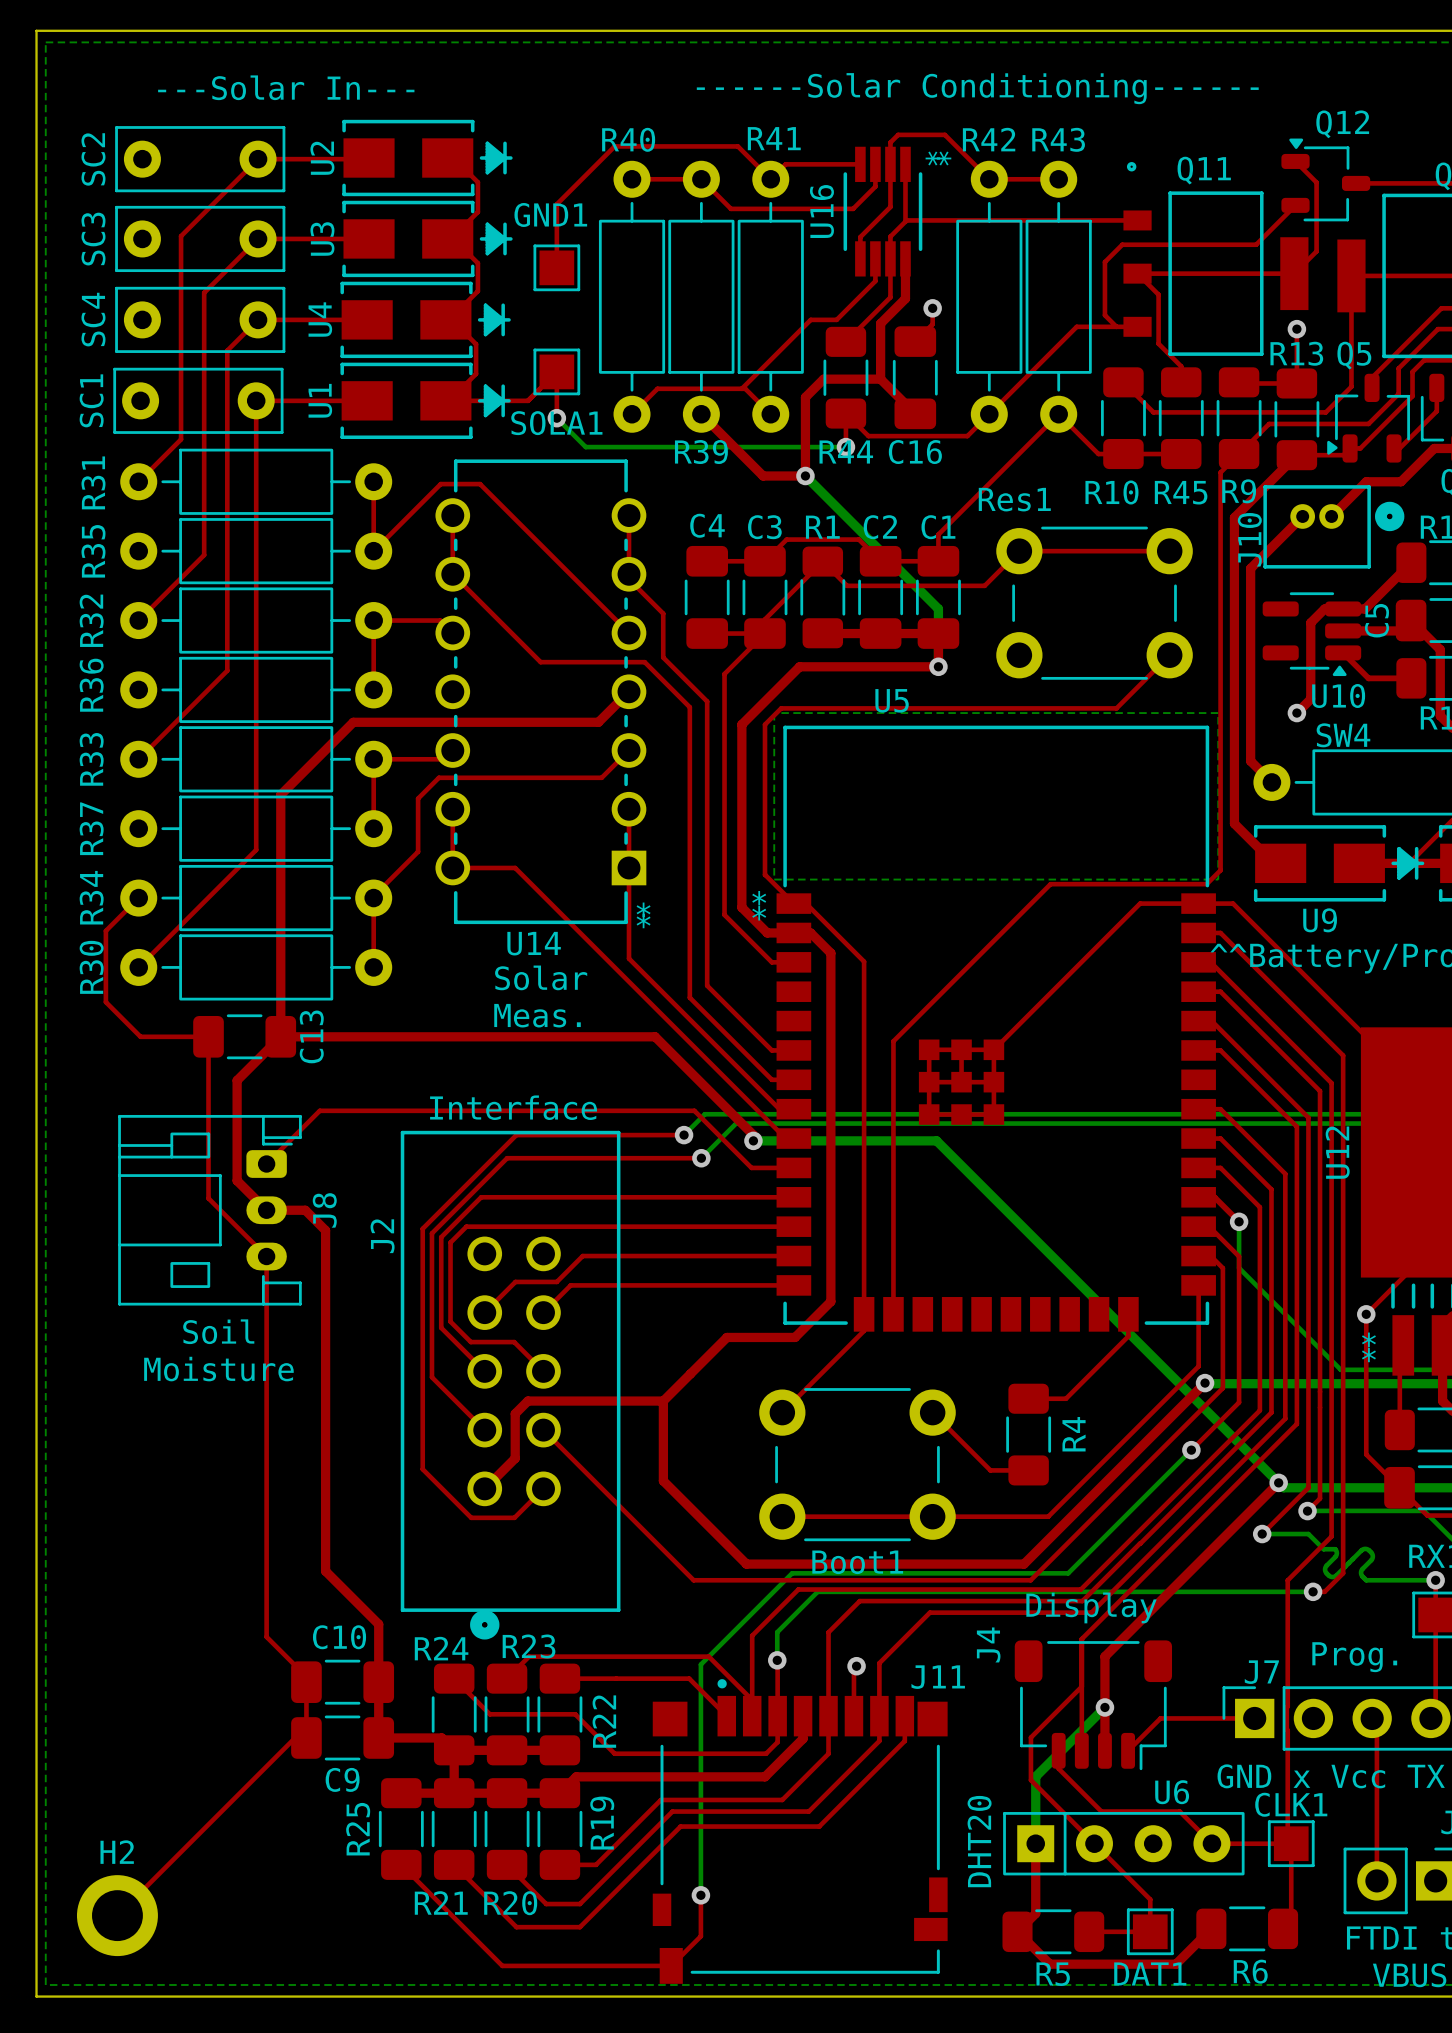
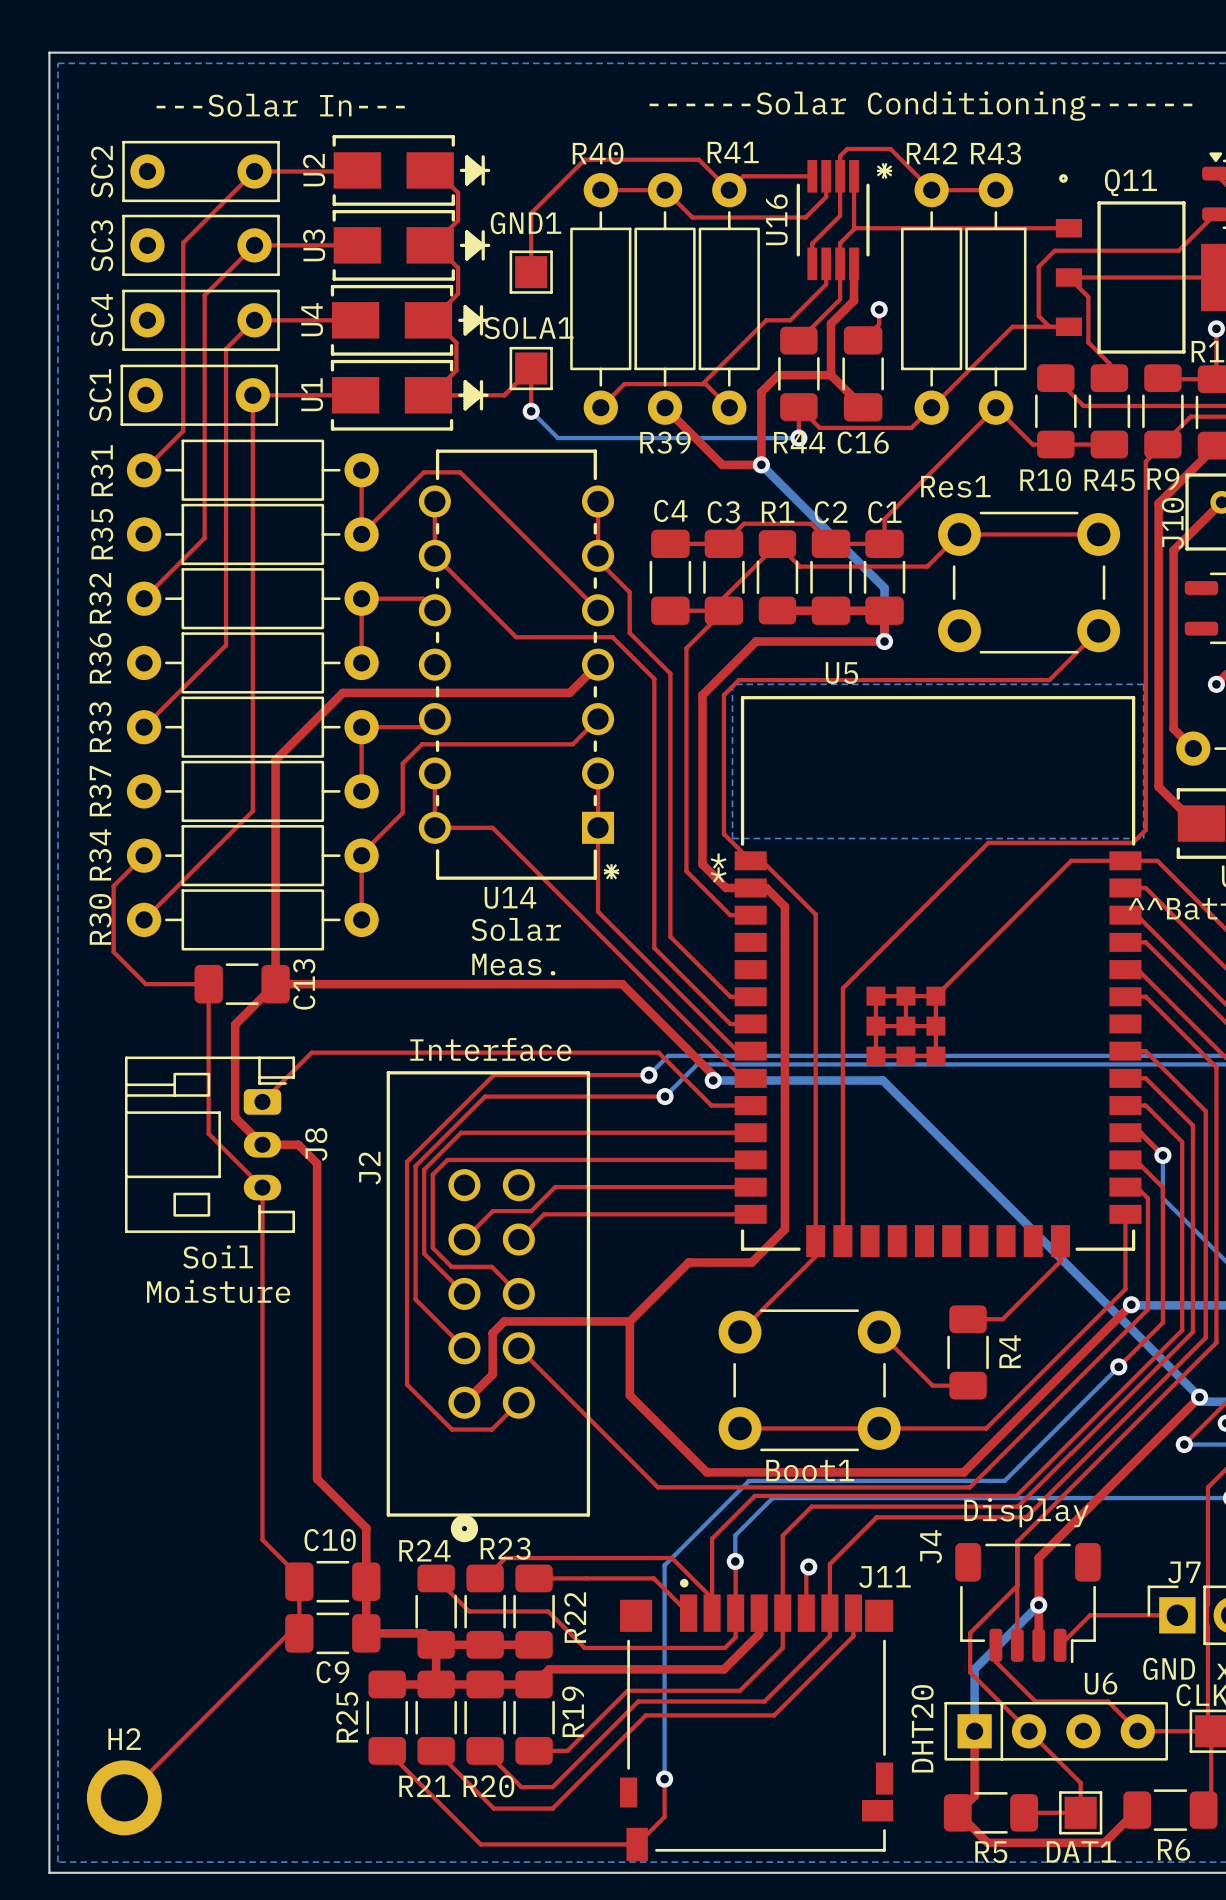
SOLA1 name position: SOLA1 (556, 423) -> SOLA1 (529, 328)

